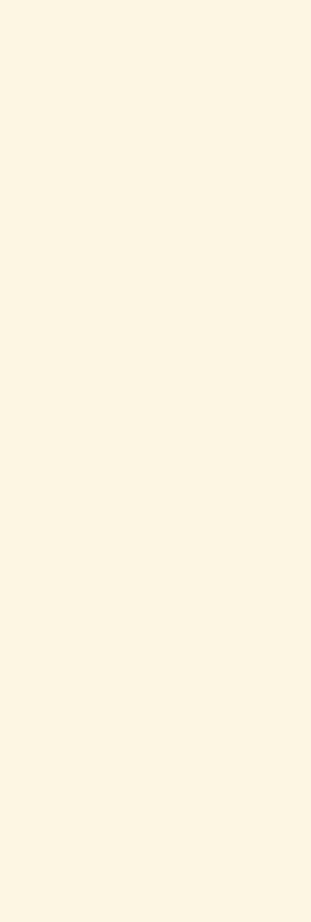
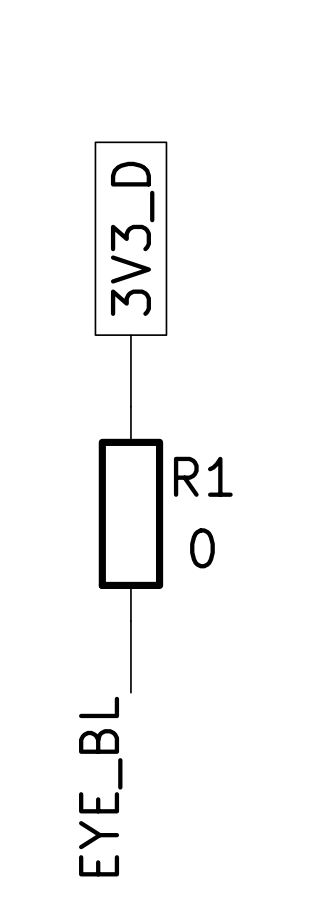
global label: none -> 3V3_D (132, 238)
wire: none -> (130, 335) (130, 406)
R1: none -> 0 (130, 513)
wire: none -> (130, 621) (130, 692)
label: none -> EYE_BL (100, 786)

